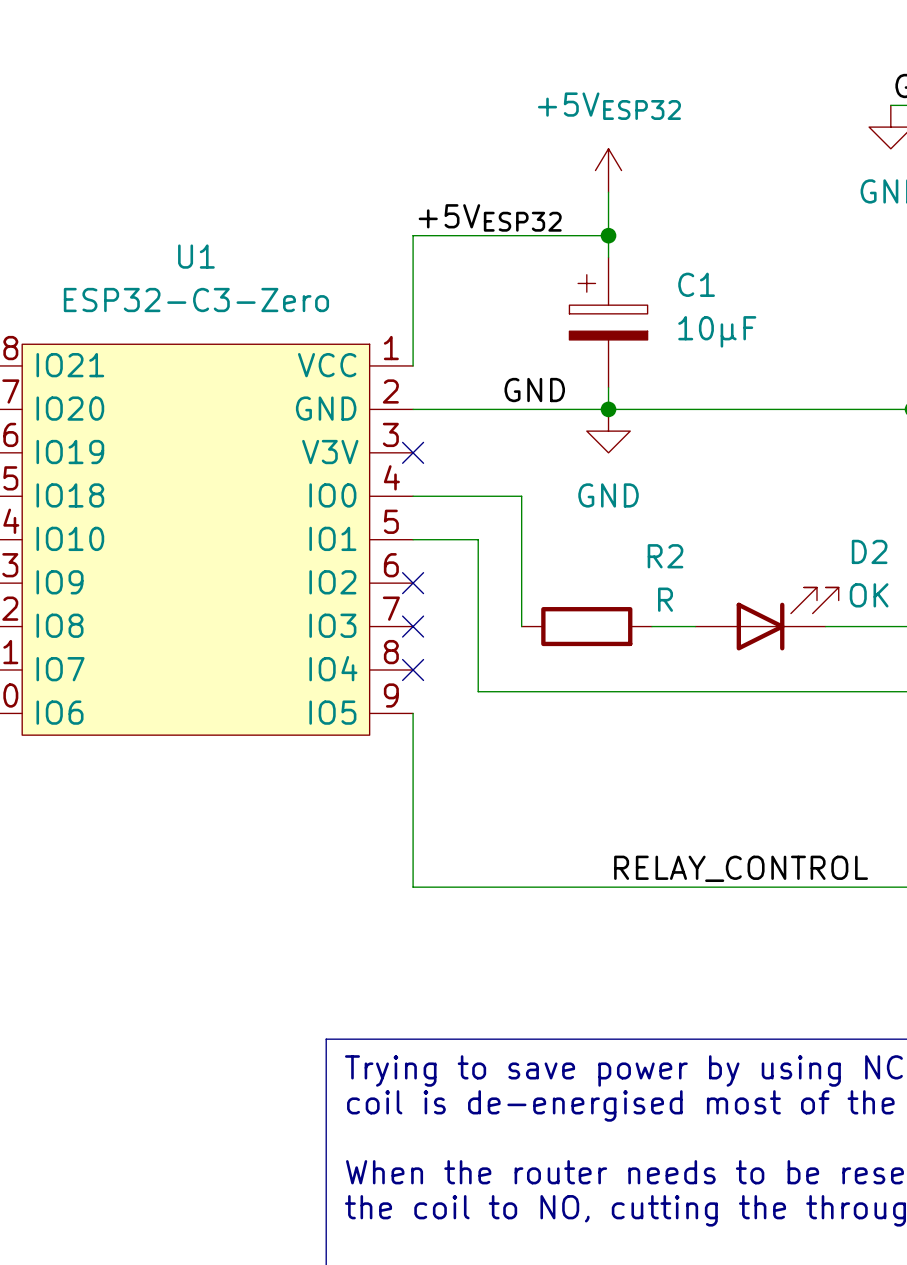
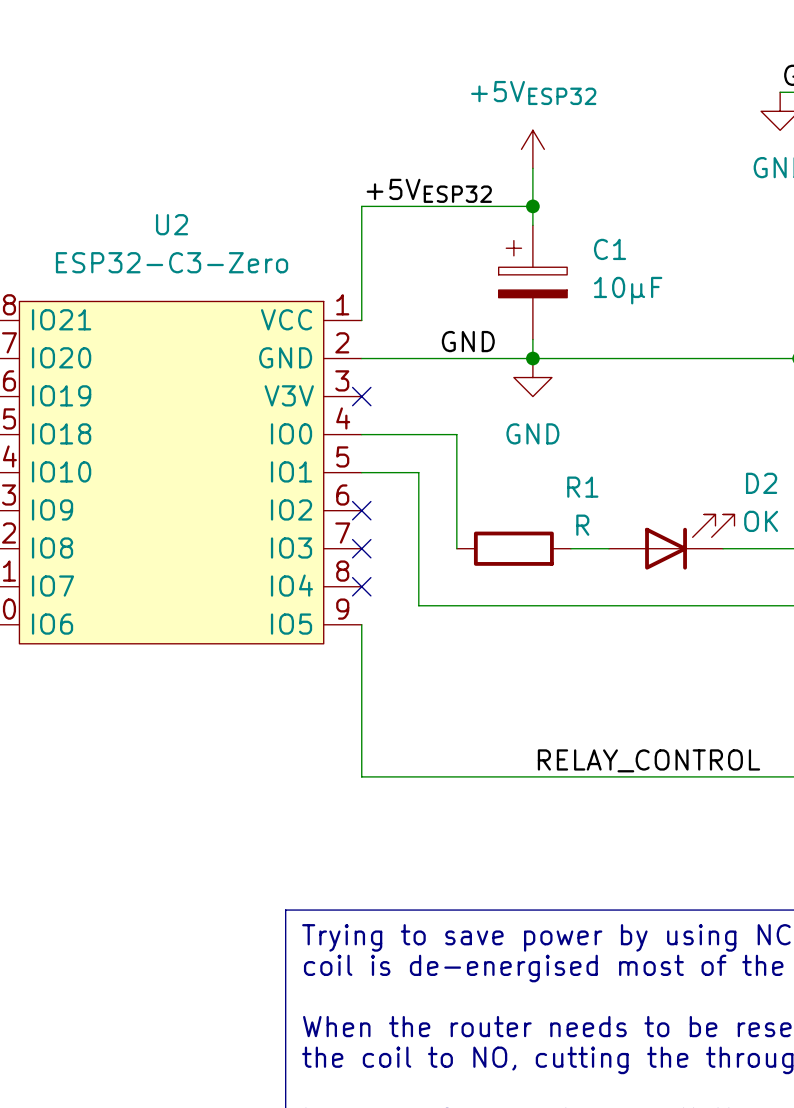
U1 name: U1 (196, 256) -> U2 (172, 224)
R2 name: R2 (665, 556) -> R1 (582, 487)

